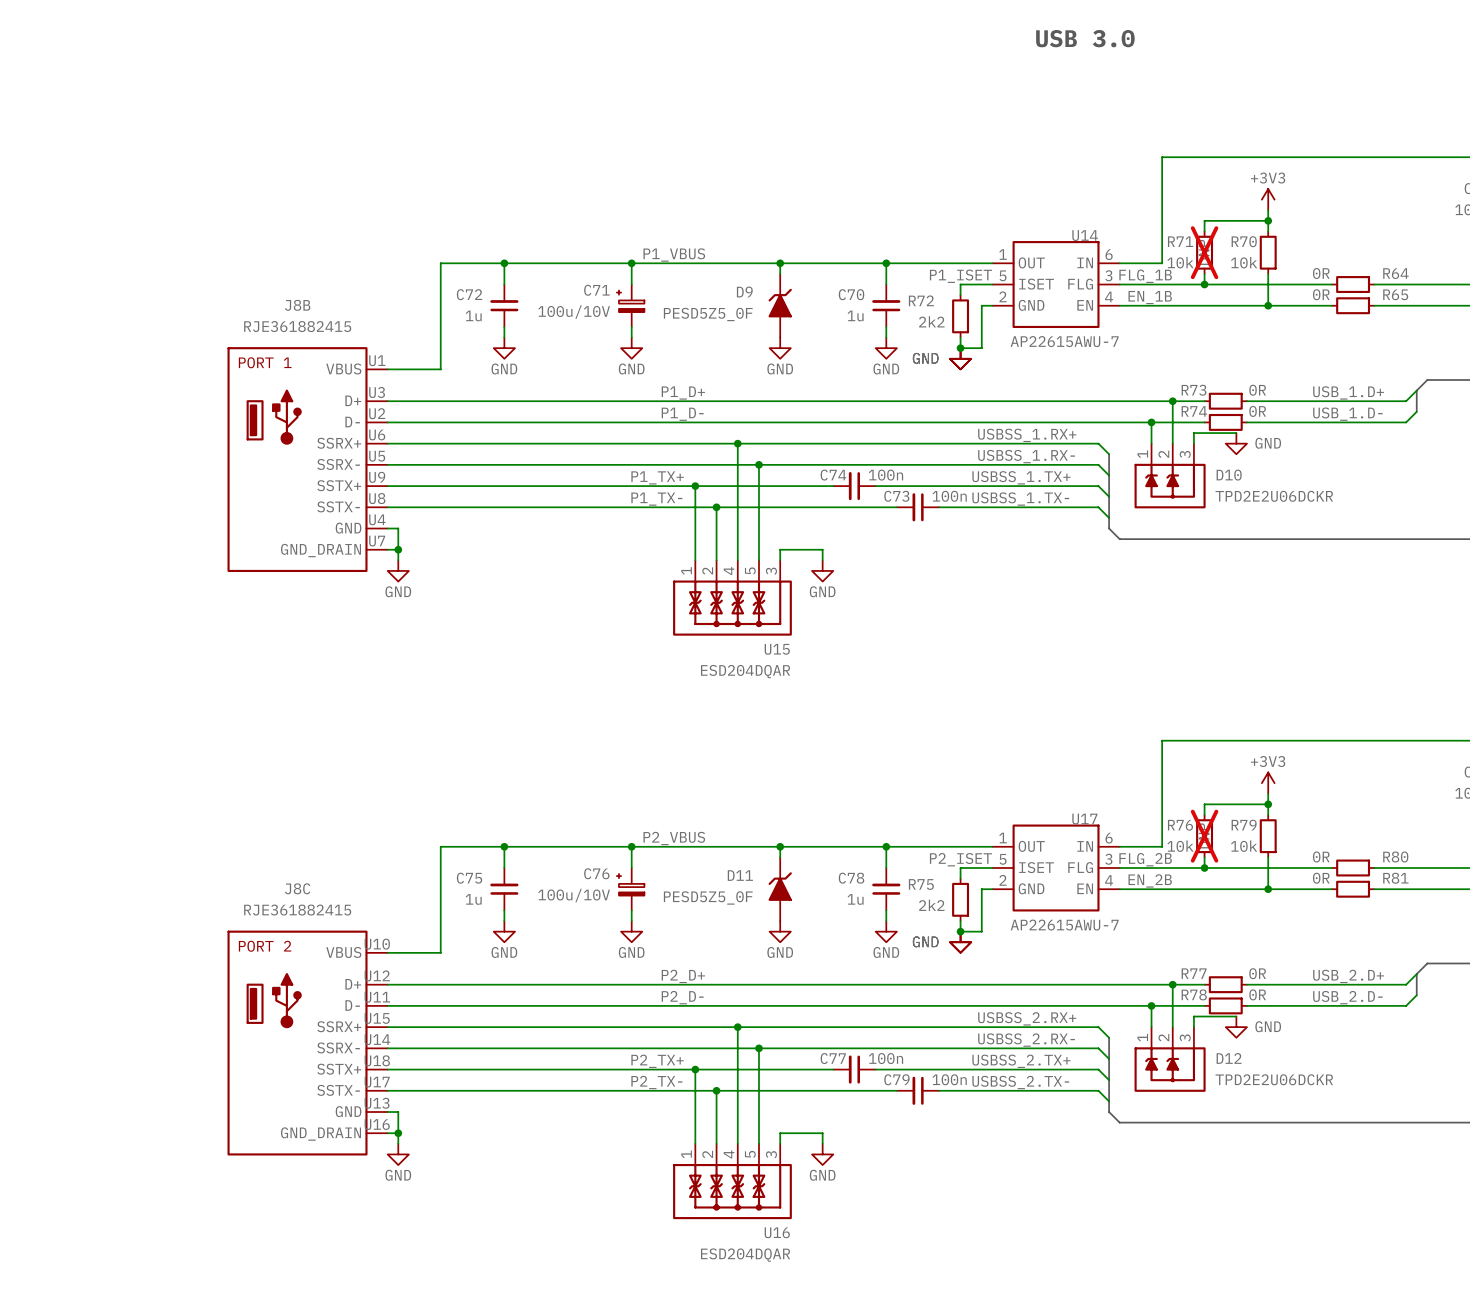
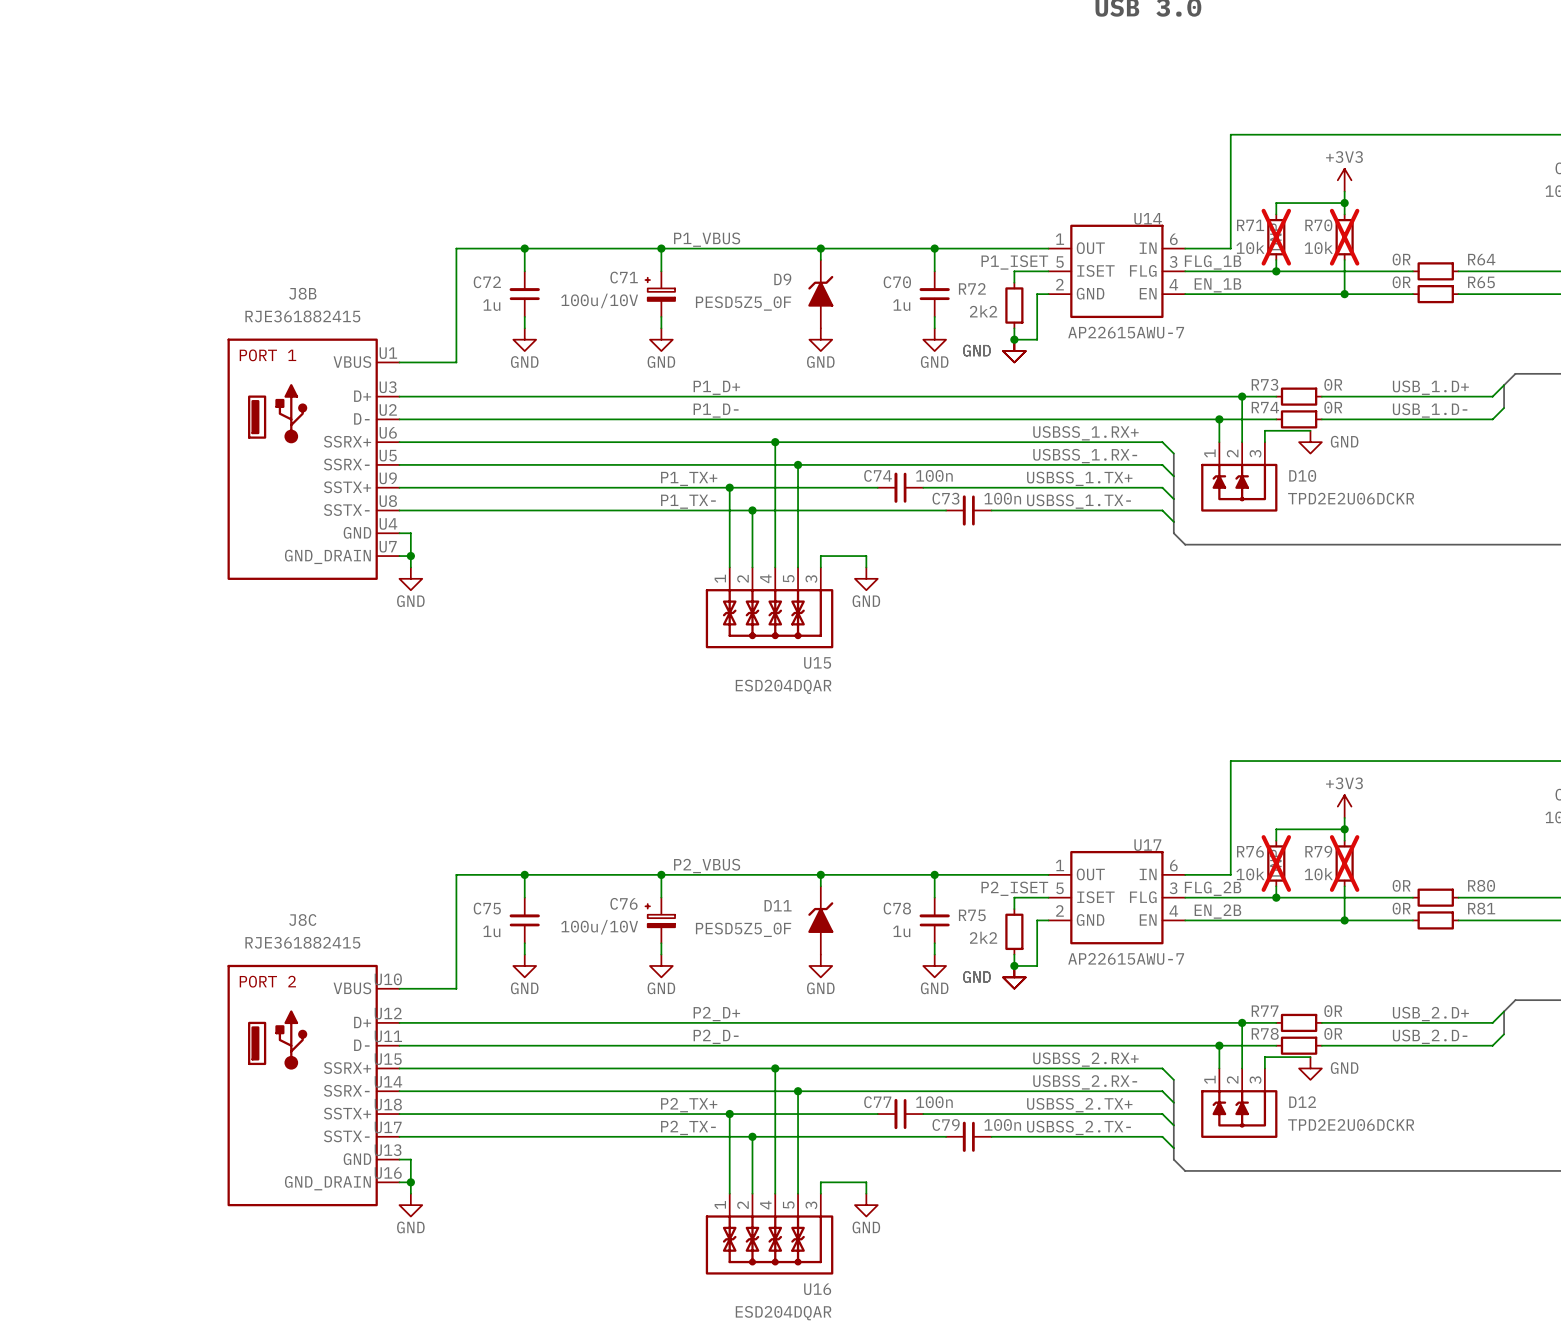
R70 do-not-place cross: none -> (1344, 237)
R79 do-not-place cross: none -> (1344, 863)

